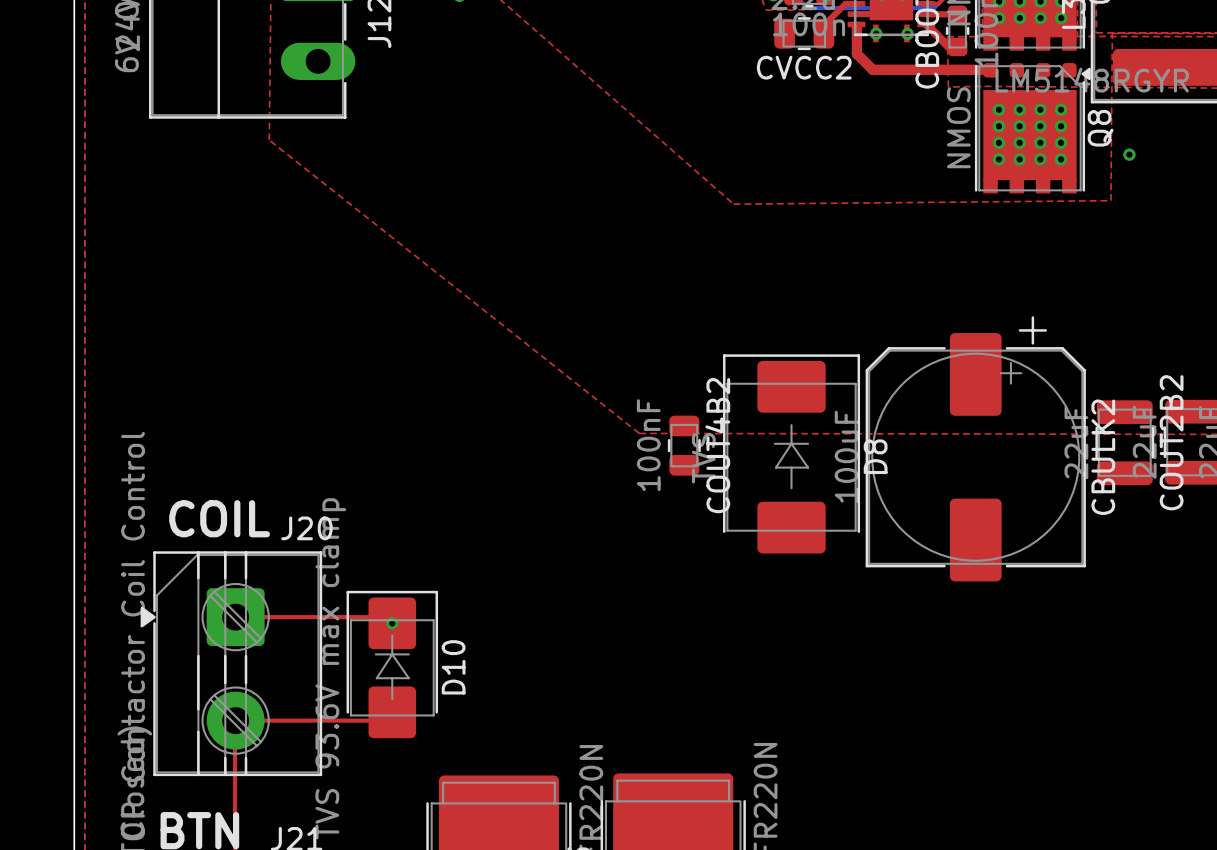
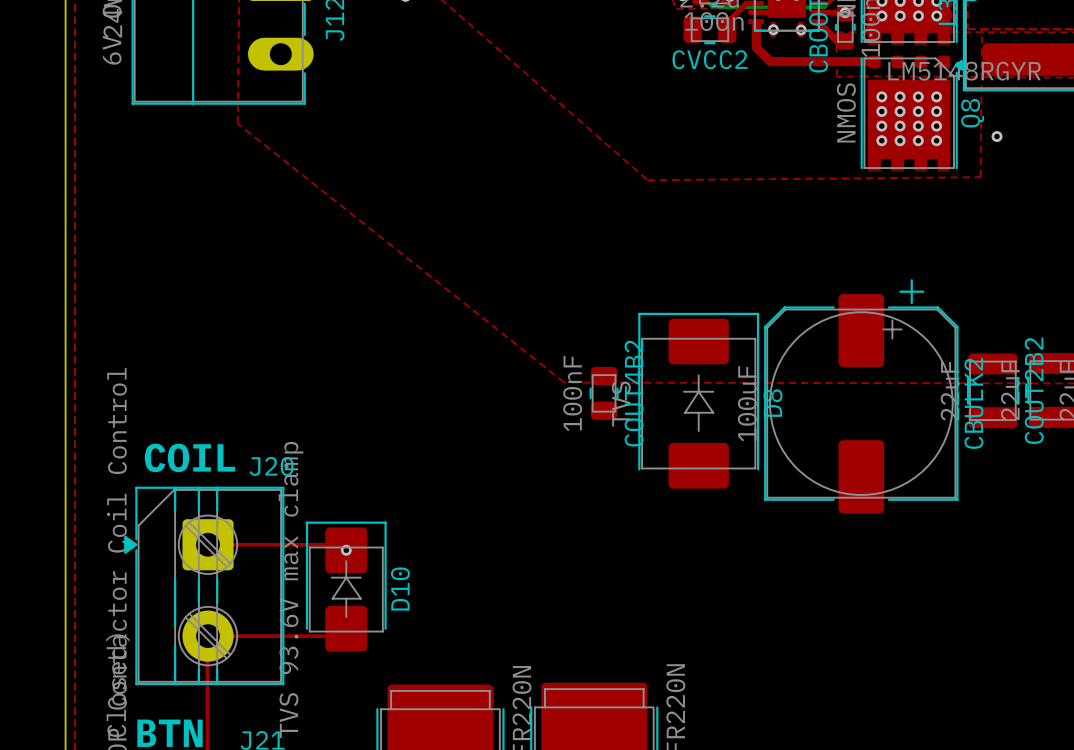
via: none -> (845, 12)

